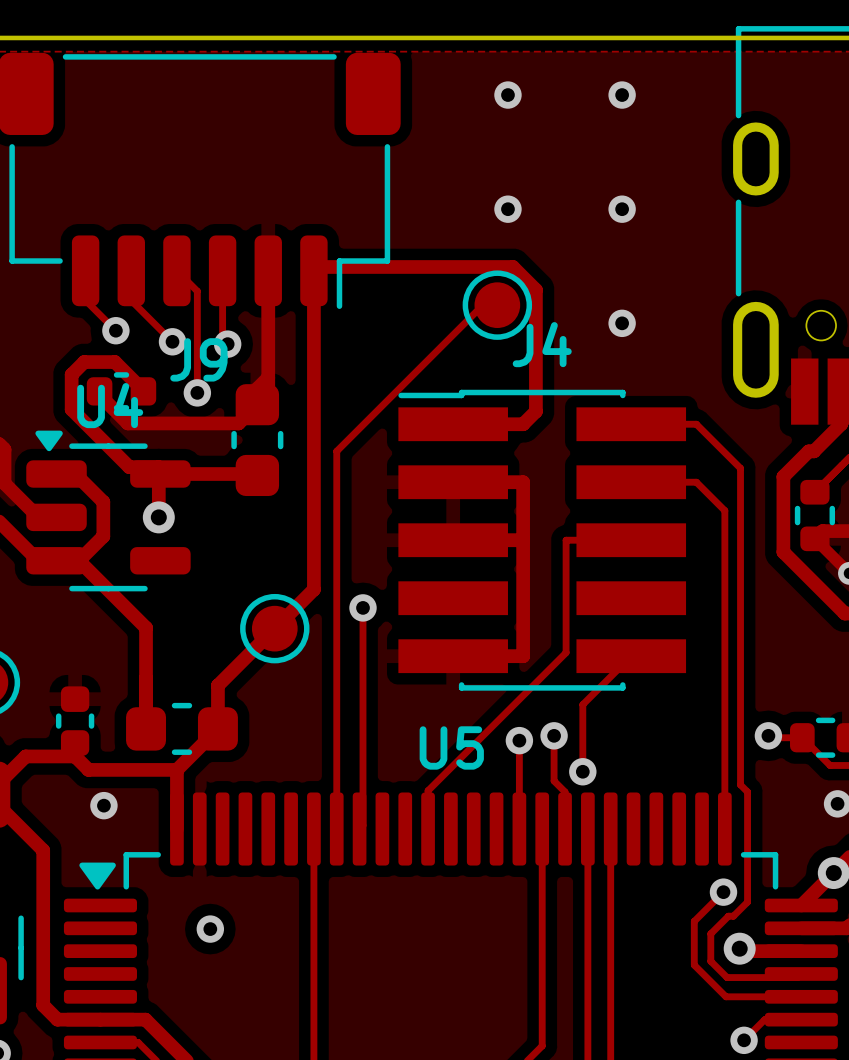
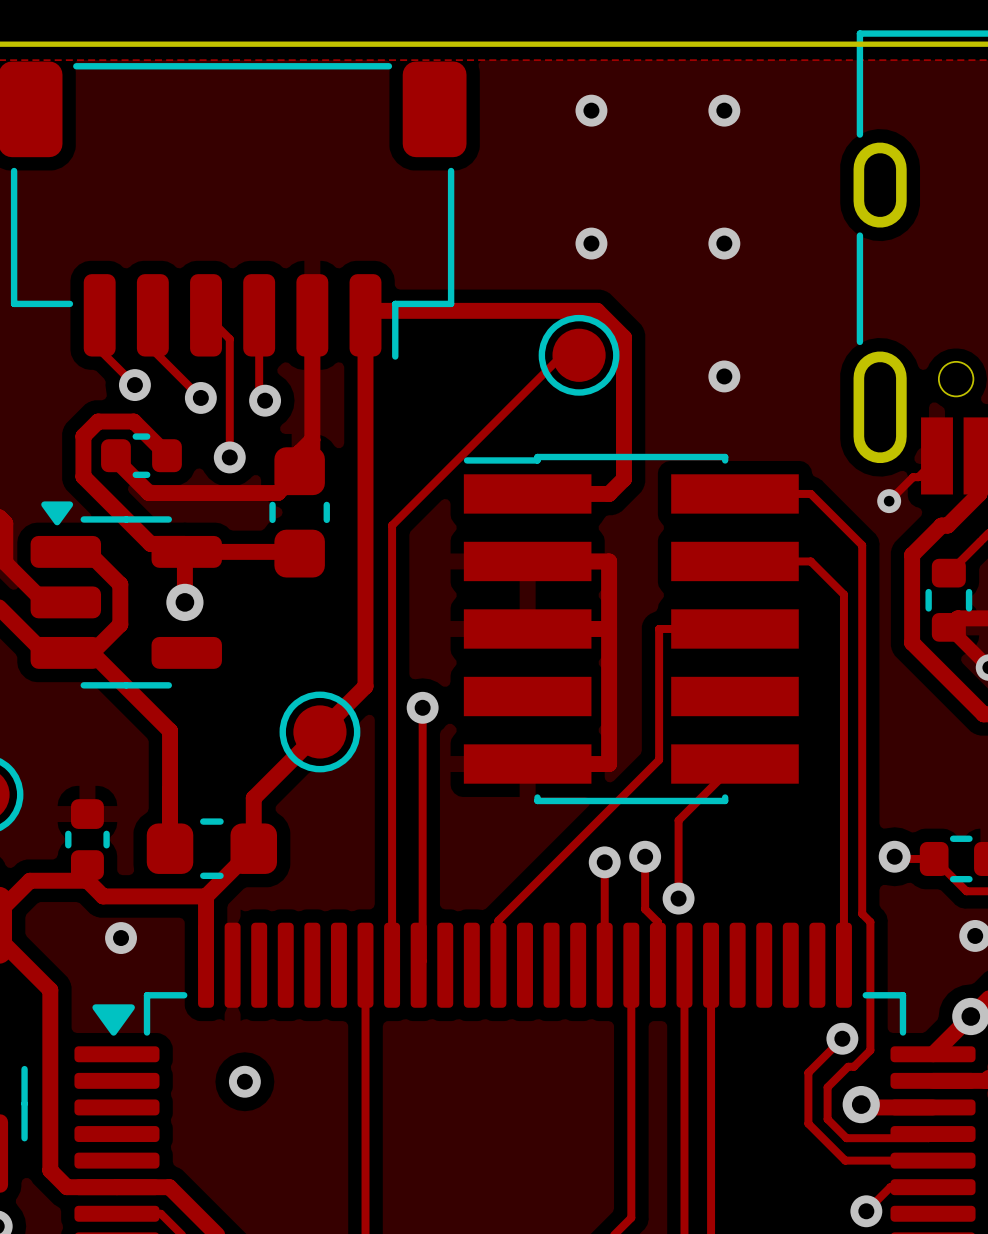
J4 name: J4 (542, 344) -> none
J9 name: J9 (198, 359) -> none
track: none -> (937, 455) (937, 458) (918, 477) (913, 477) (889, 501)
U4 name: U4 (110, 405) -> none
via: none -> (889, 501)
U5 name: U5 (451, 747) -> none

